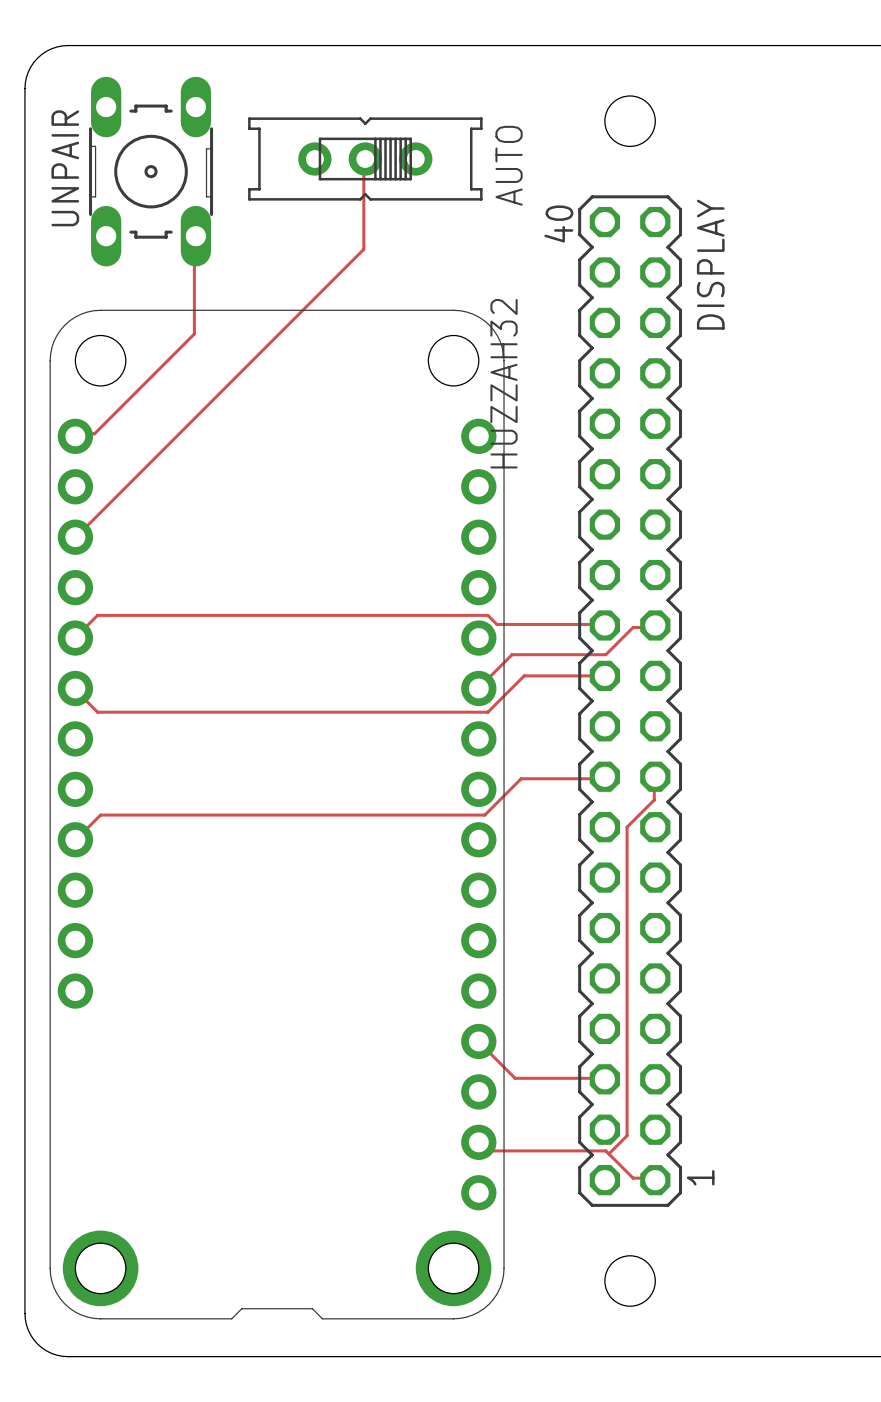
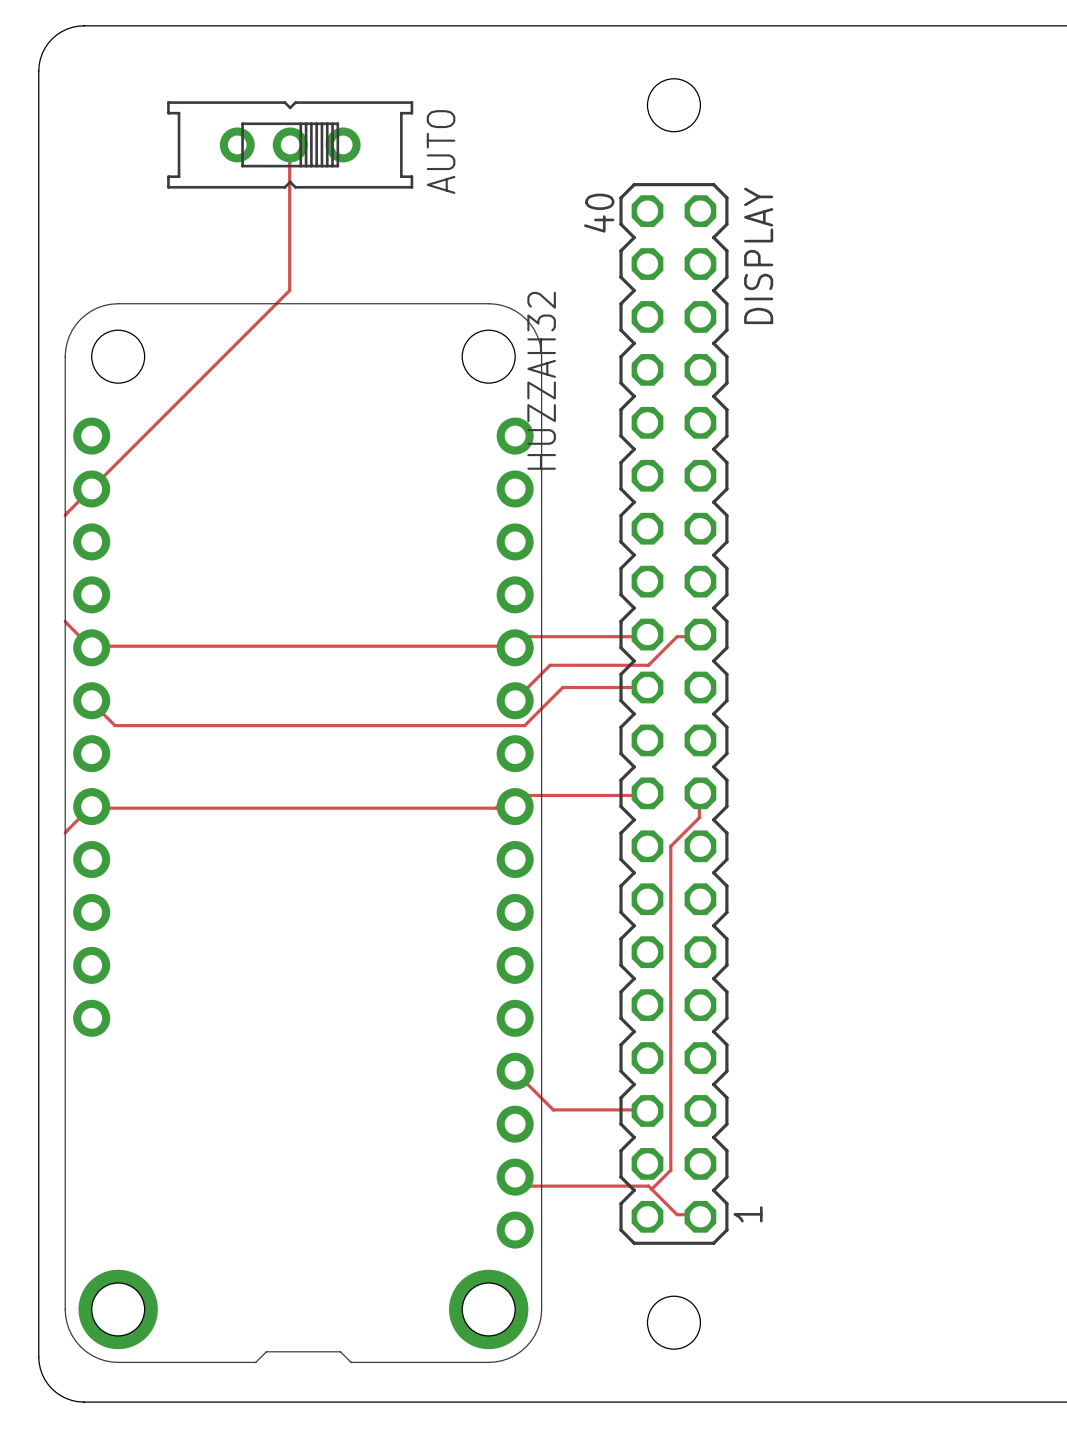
track: none -> (290, 144) (289, 290) (65, 515)
track: (365, 159) (363, 249) (75, 537) -> none
AUTO position: (365, 159) -> (290, 144)
UNPAIR: (151, 171) -> none
track: (195, 236) (194, 333) (94, 433) (76, 433) (75, 436) -> none
track: (604, 625) (496, 624) (487, 615) (97, 615) (75, 638) -> (647, 634) (645, 636) (508, 636) (499, 646) (89, 646) (65, 621)
track: (521, 778) (484, 815) (100, 815) (75, 839) -> (559, 795) (508, 795) (496, 808) (89, 808) (65, 833)

